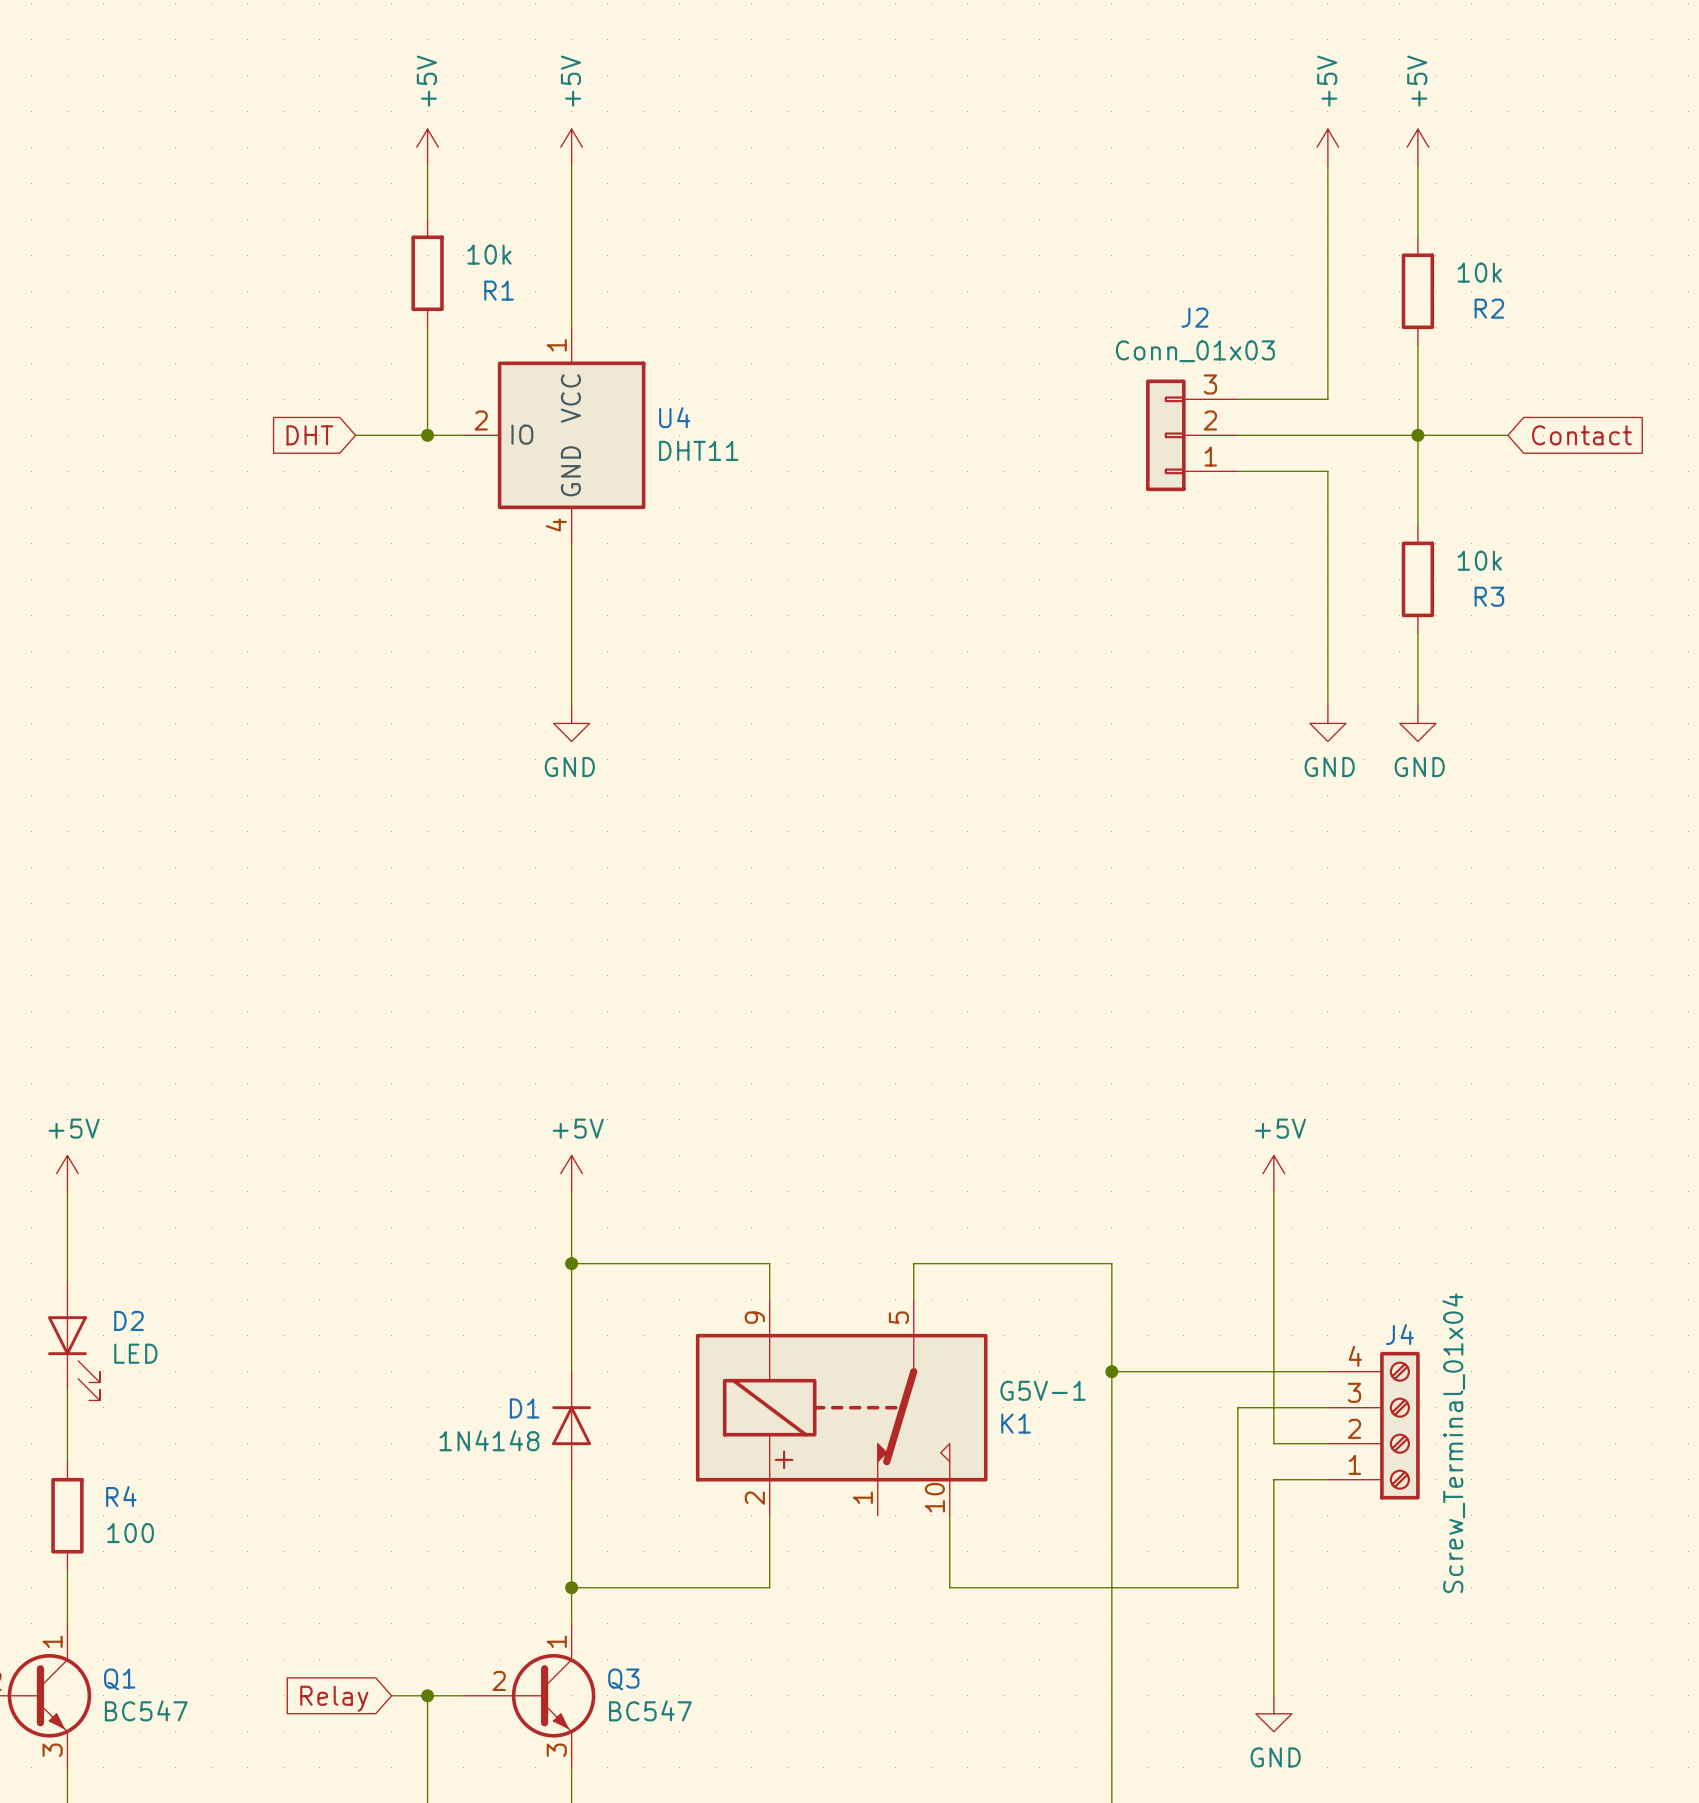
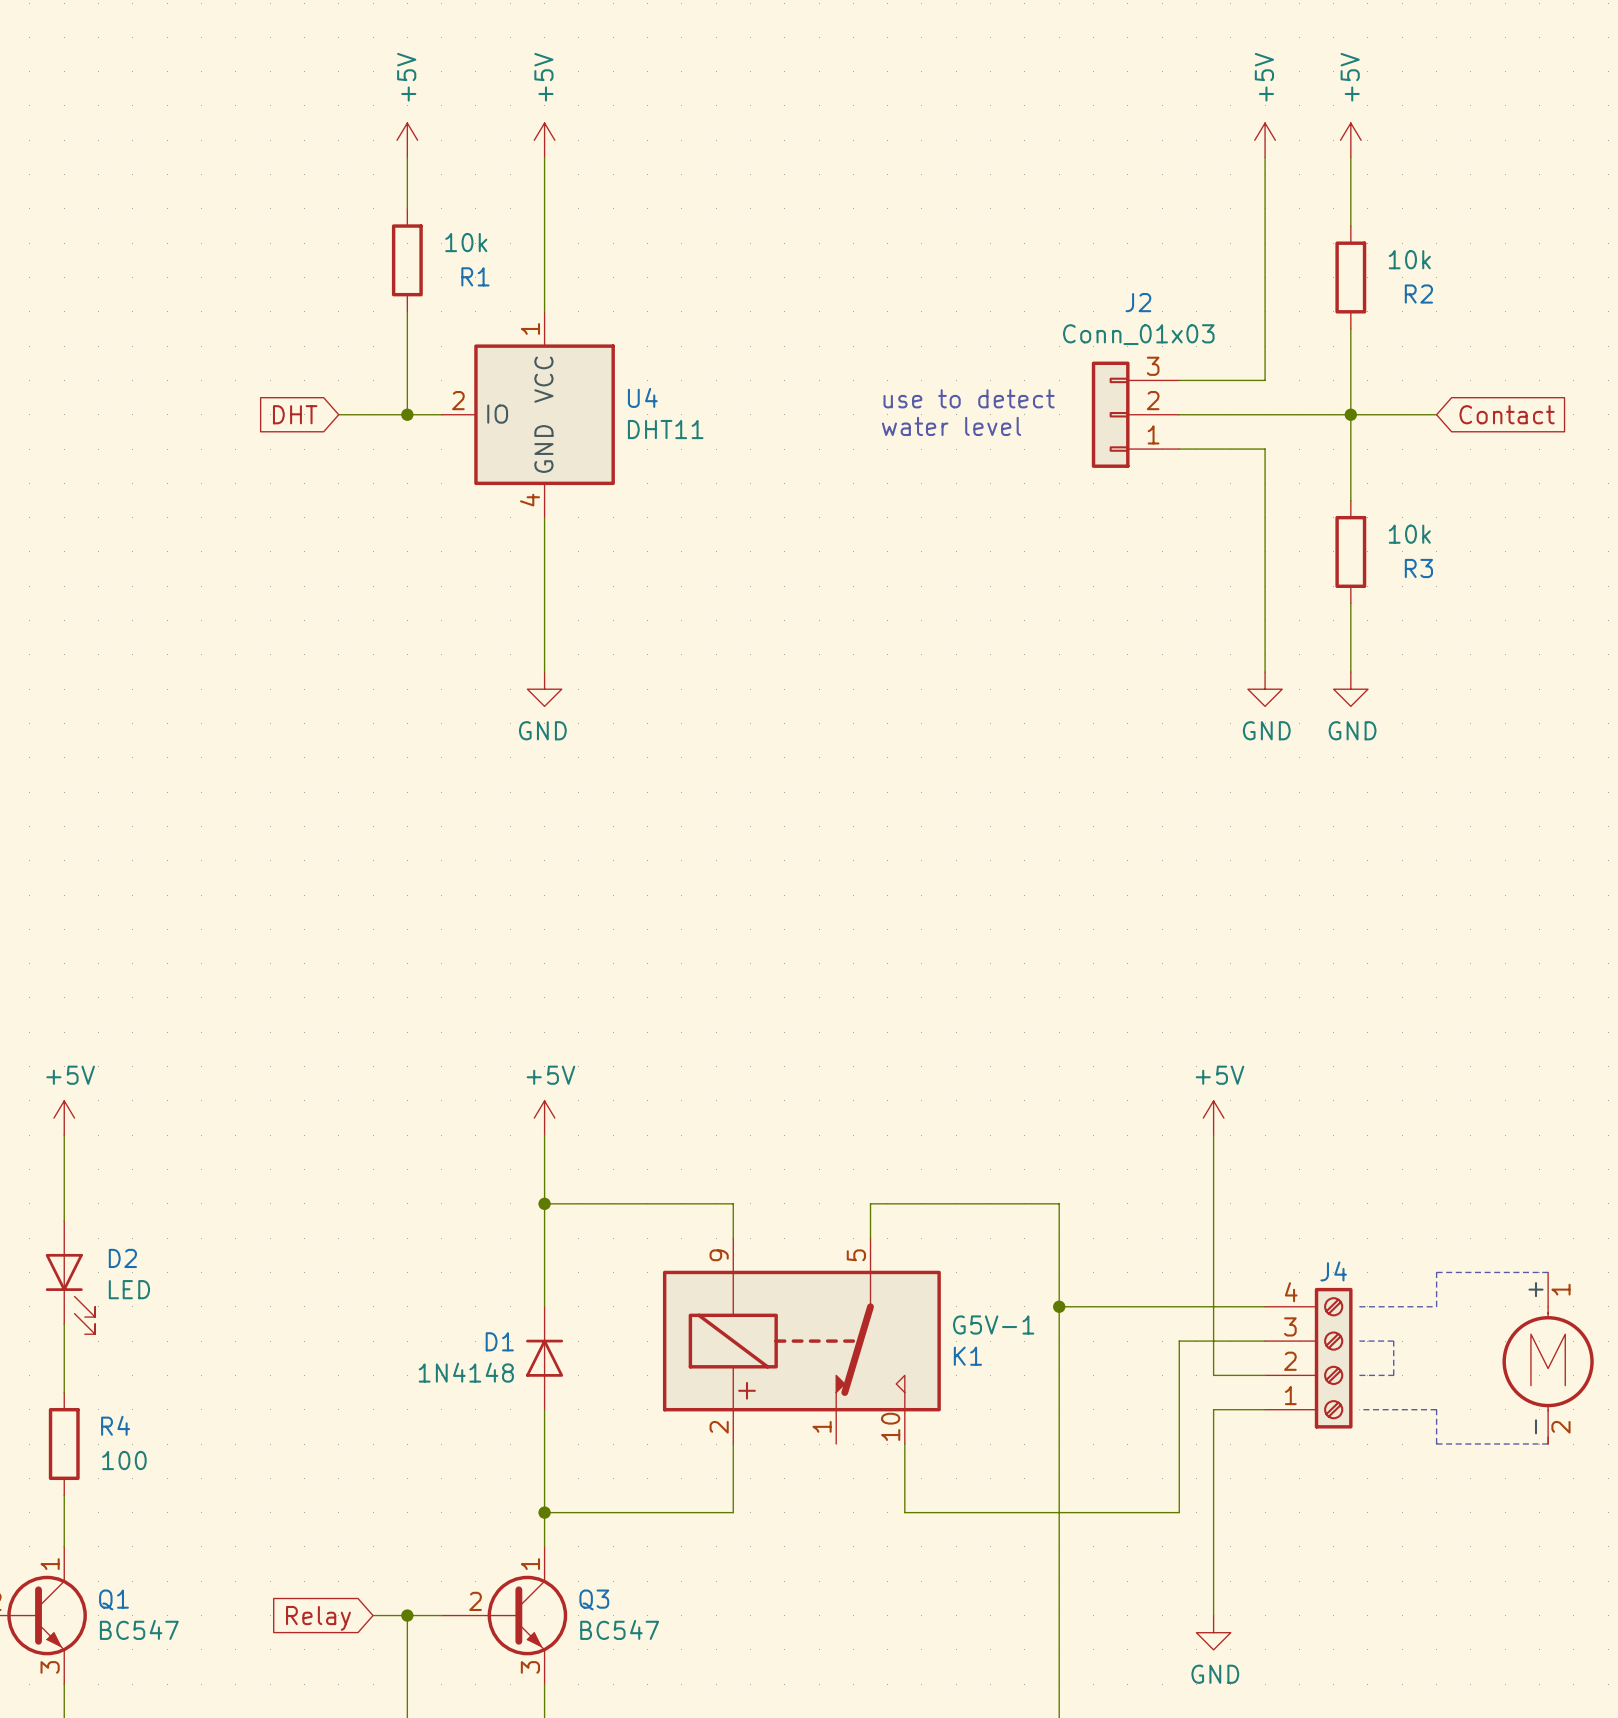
text: none -> use to detect (969, 398)
text: none -> water level (951, 426)
line: none -> (1548, 1272) (1436, 1272) (1436, 1306) (1359, 1306)
line: none -> (1359, 1341) (1393, 1341) (1393, 1375) (1359, 1375)
power symbol: none -> (1548, 1358)
J4 value: Screw_Terminal_01x04 (1453, 1443) -> none
line: none -> (1359, 1409) (1436, 1409) (1436, 1444) (1548, 1444)

